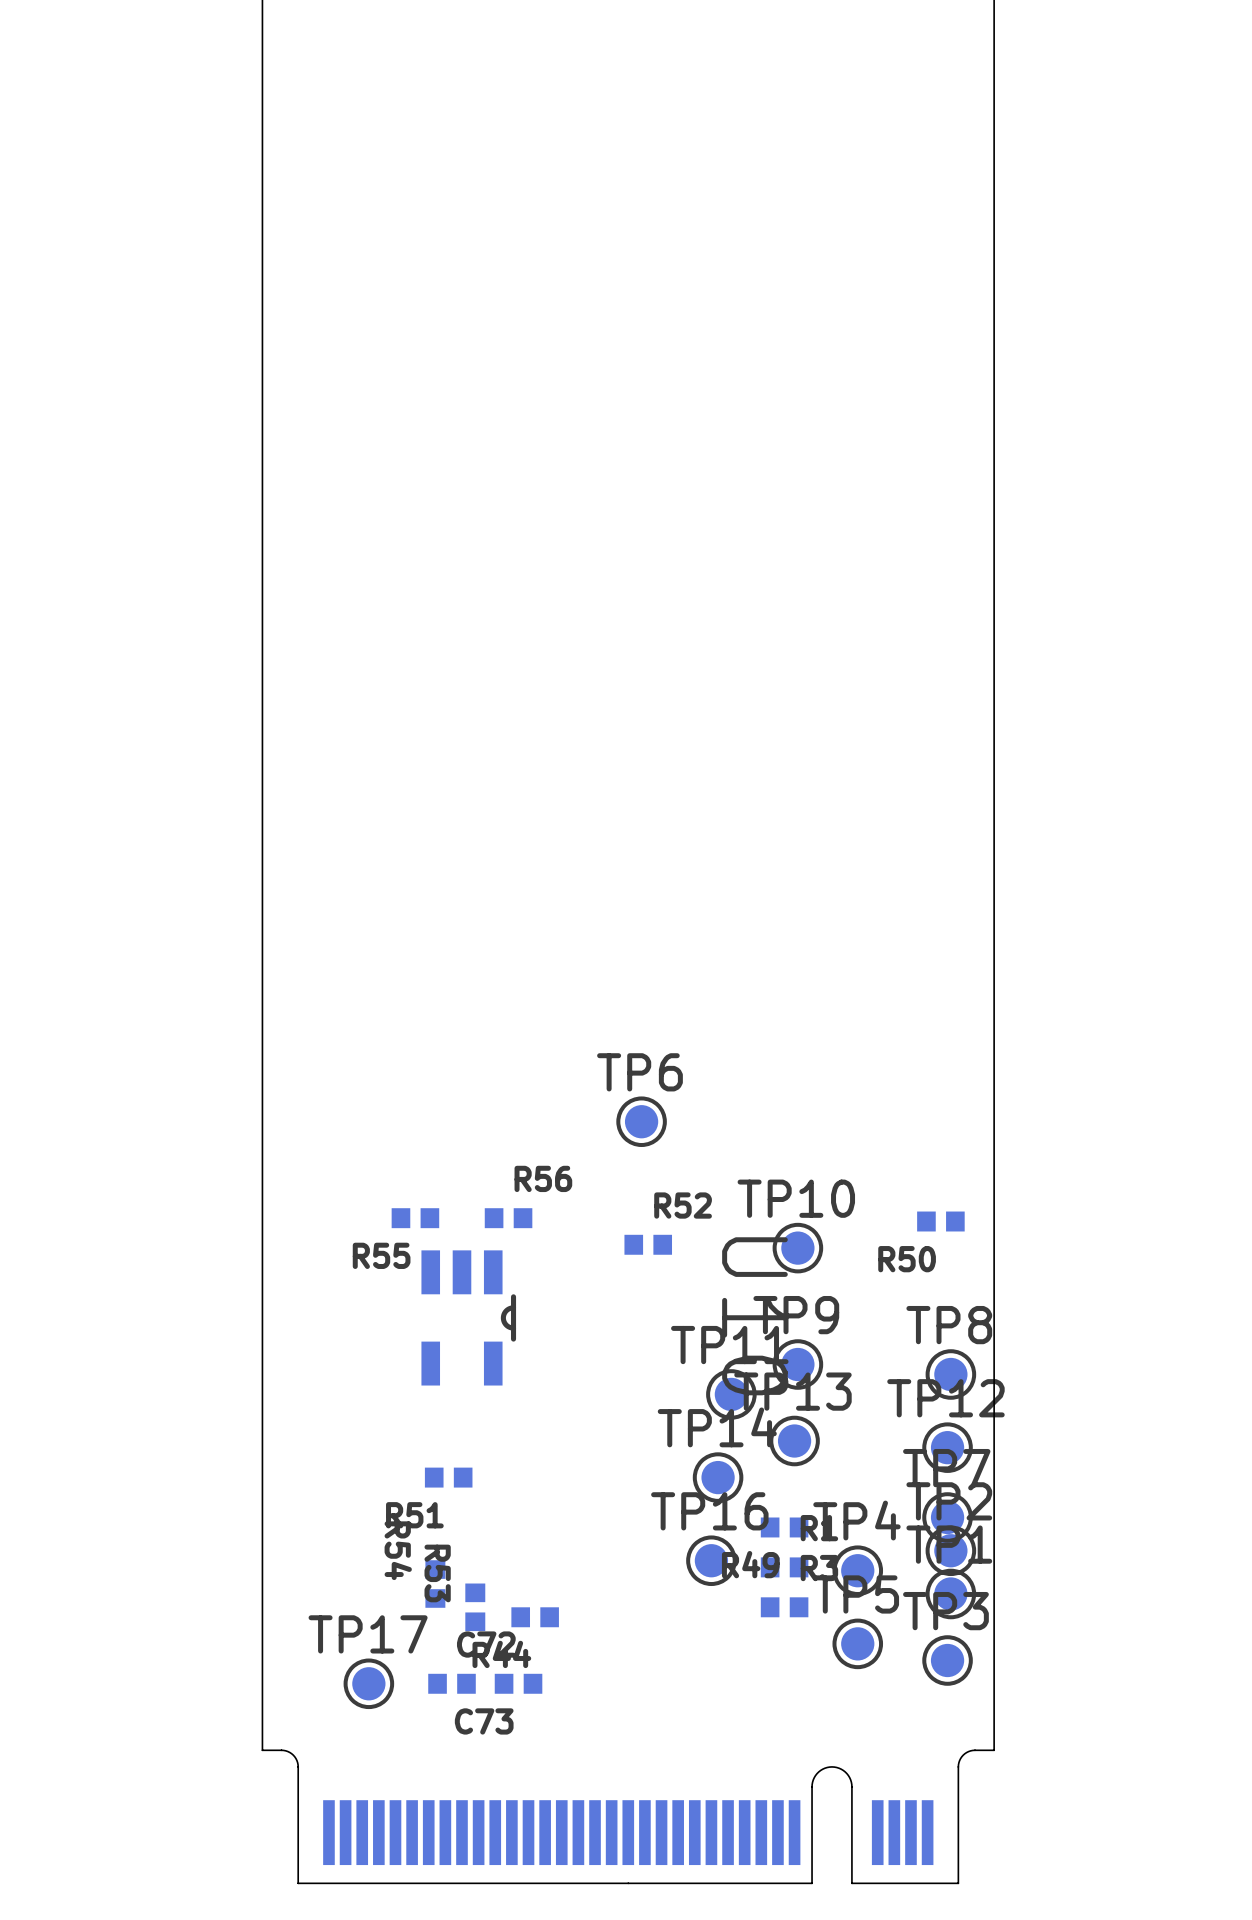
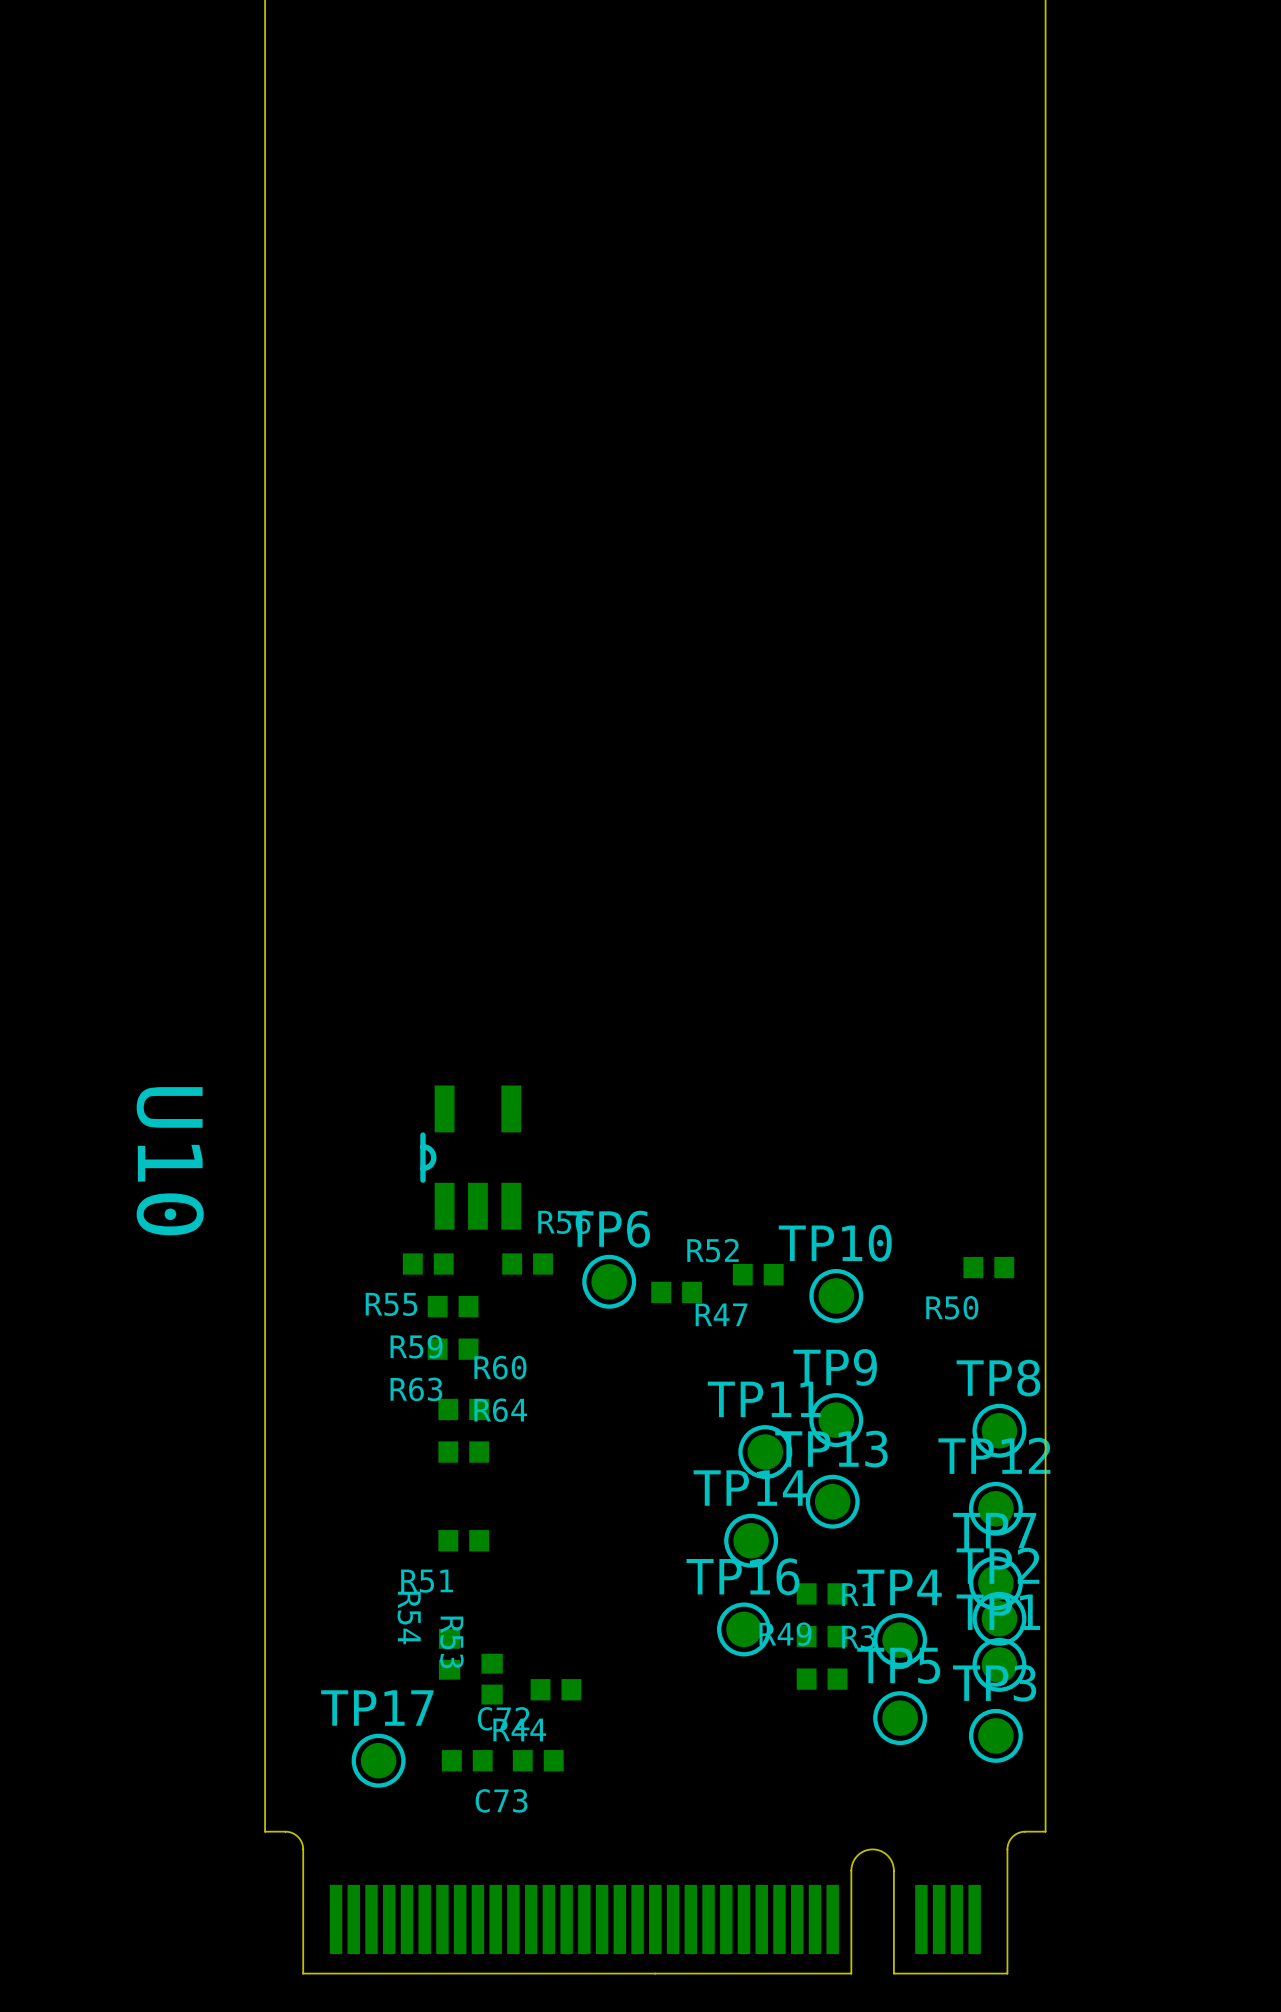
TP6 position: (641, 1121) -> (609, 1281)
R47: none -> (758, 1274)
R59: none -> (453, 1306)
R63: none -> (453, 1349)
U10 rotation: 0° (468, 1317) -> 180° (470, 1157)
U10 position: (468, 1317) -> (470, 1157)
R60: none -> (463, 1409)
R64: none -> (463, 1452)

